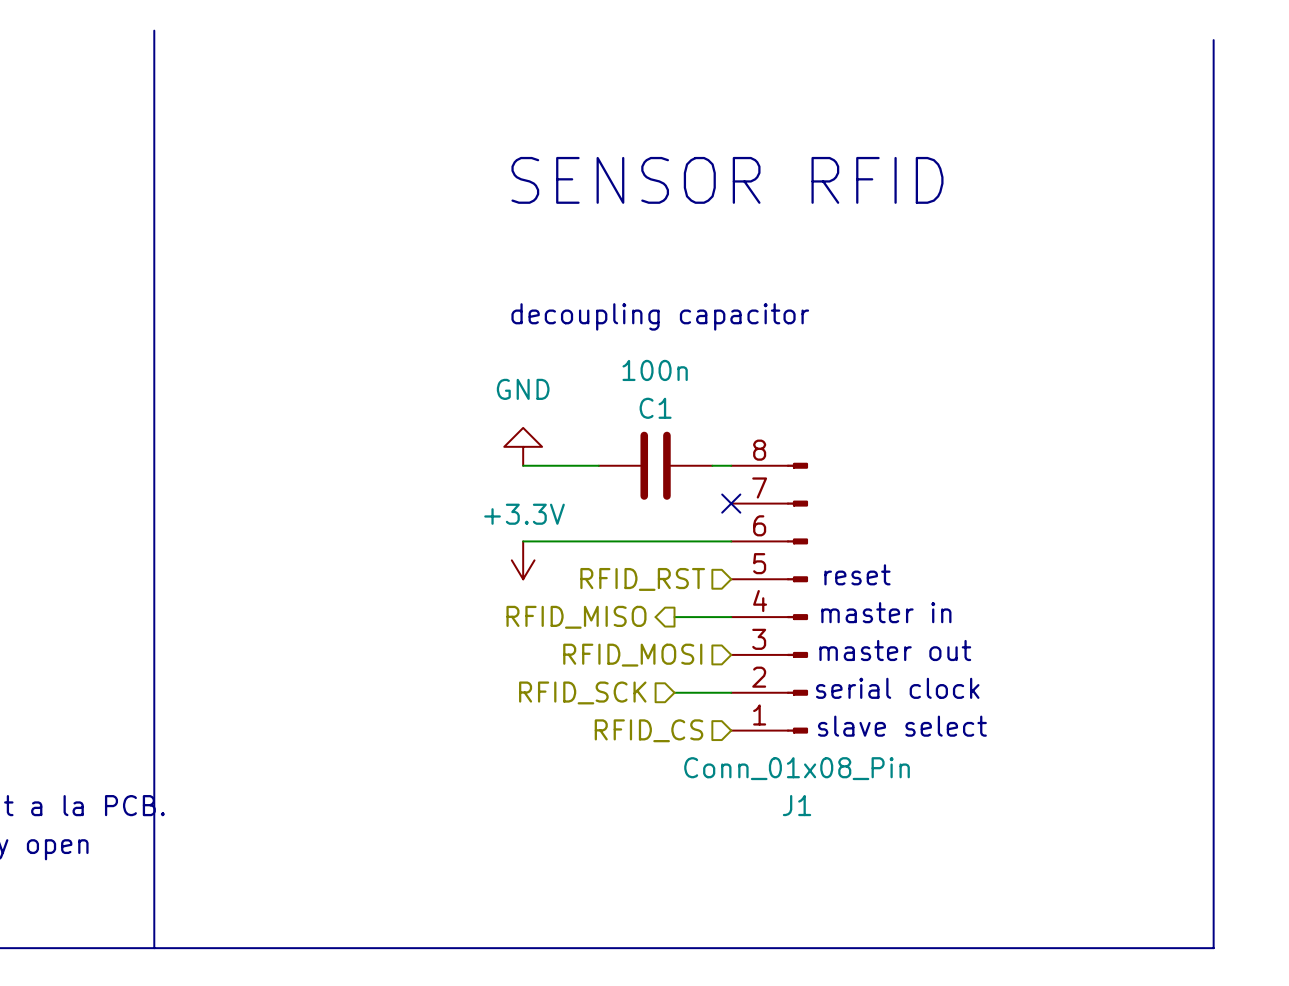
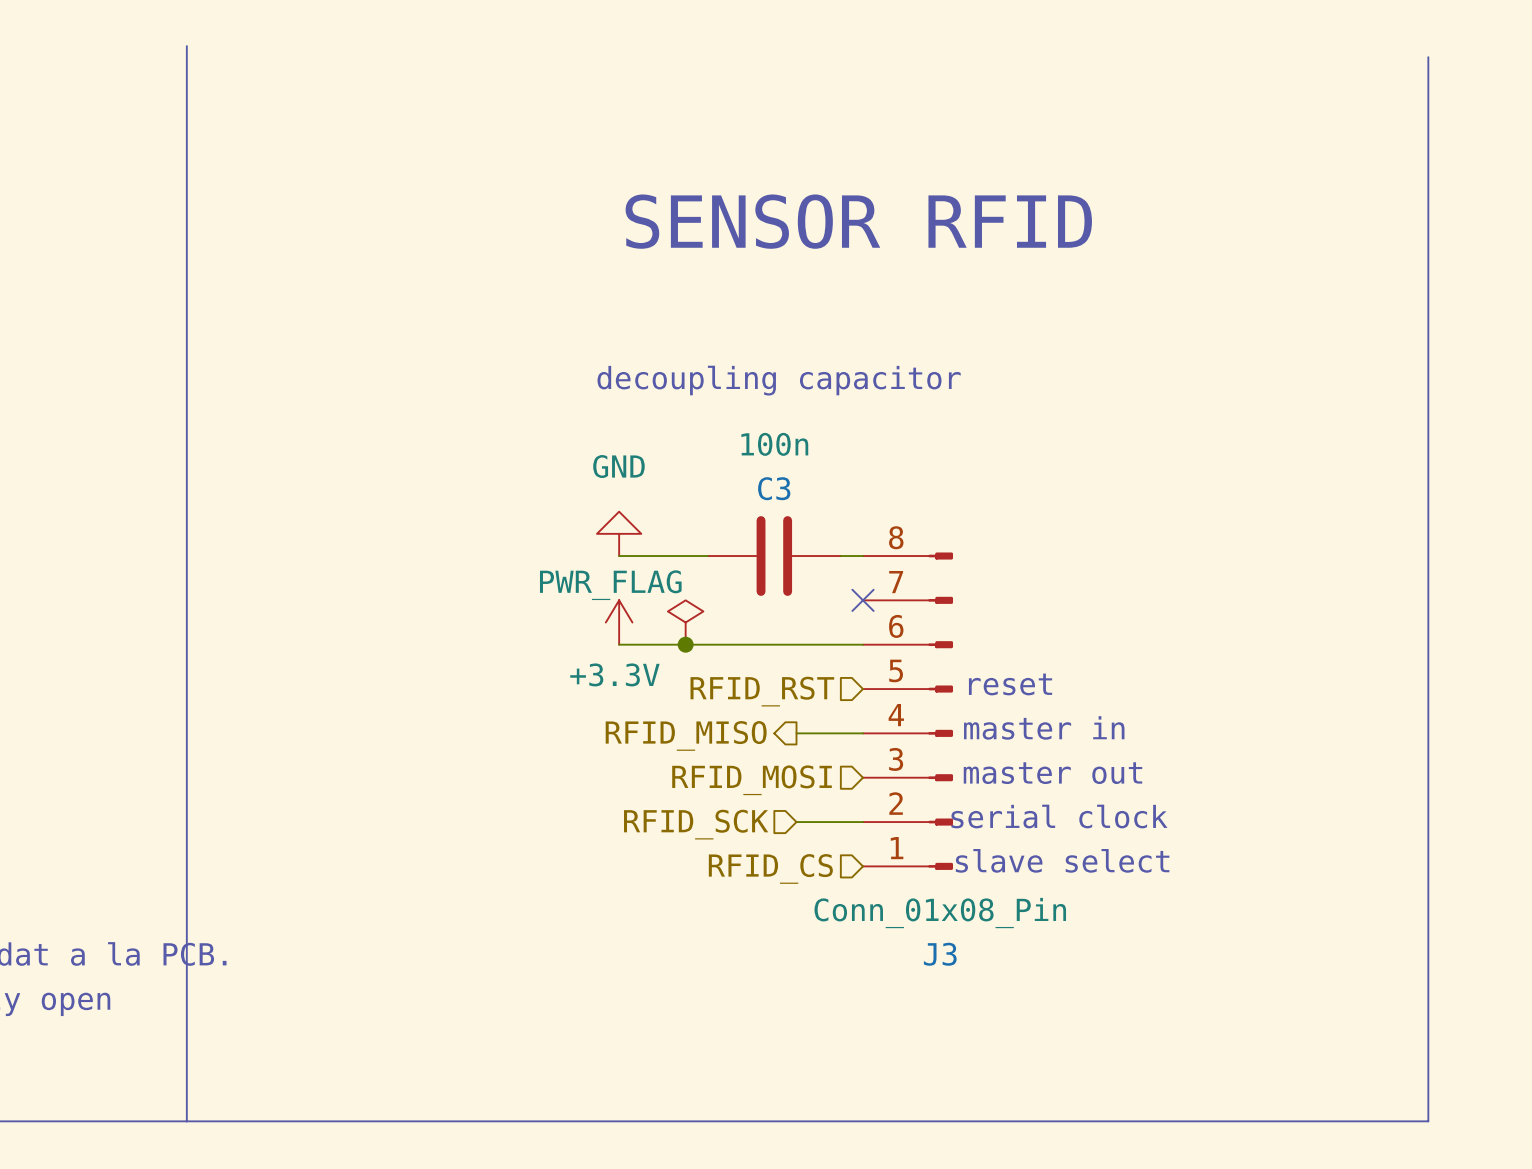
C1 name: C1 (655, 408) -> C3 (774, 488)
power symbol: none -> PWR_FLAG (685, 622)
junction: none -> (685, 644)
power symbol rotation: 0° (523, 560) -> 180° (619, 622)
power symbol position: +3.3V (523, 560) -> +3.3V (619, 622)
J1 name: J1 (797, 805) -> J3 (940, 954)

